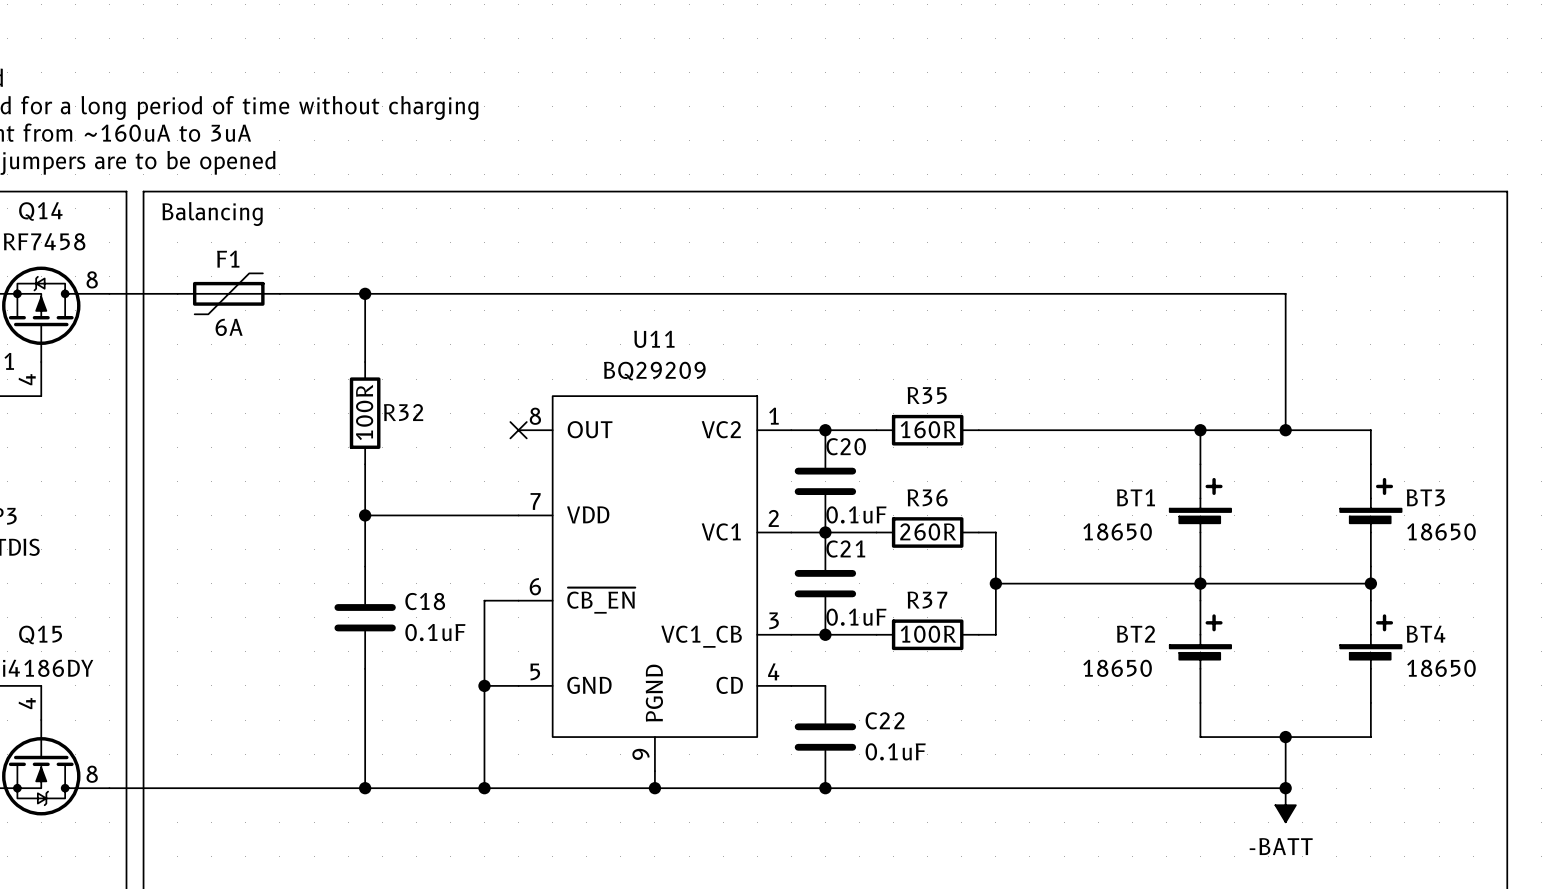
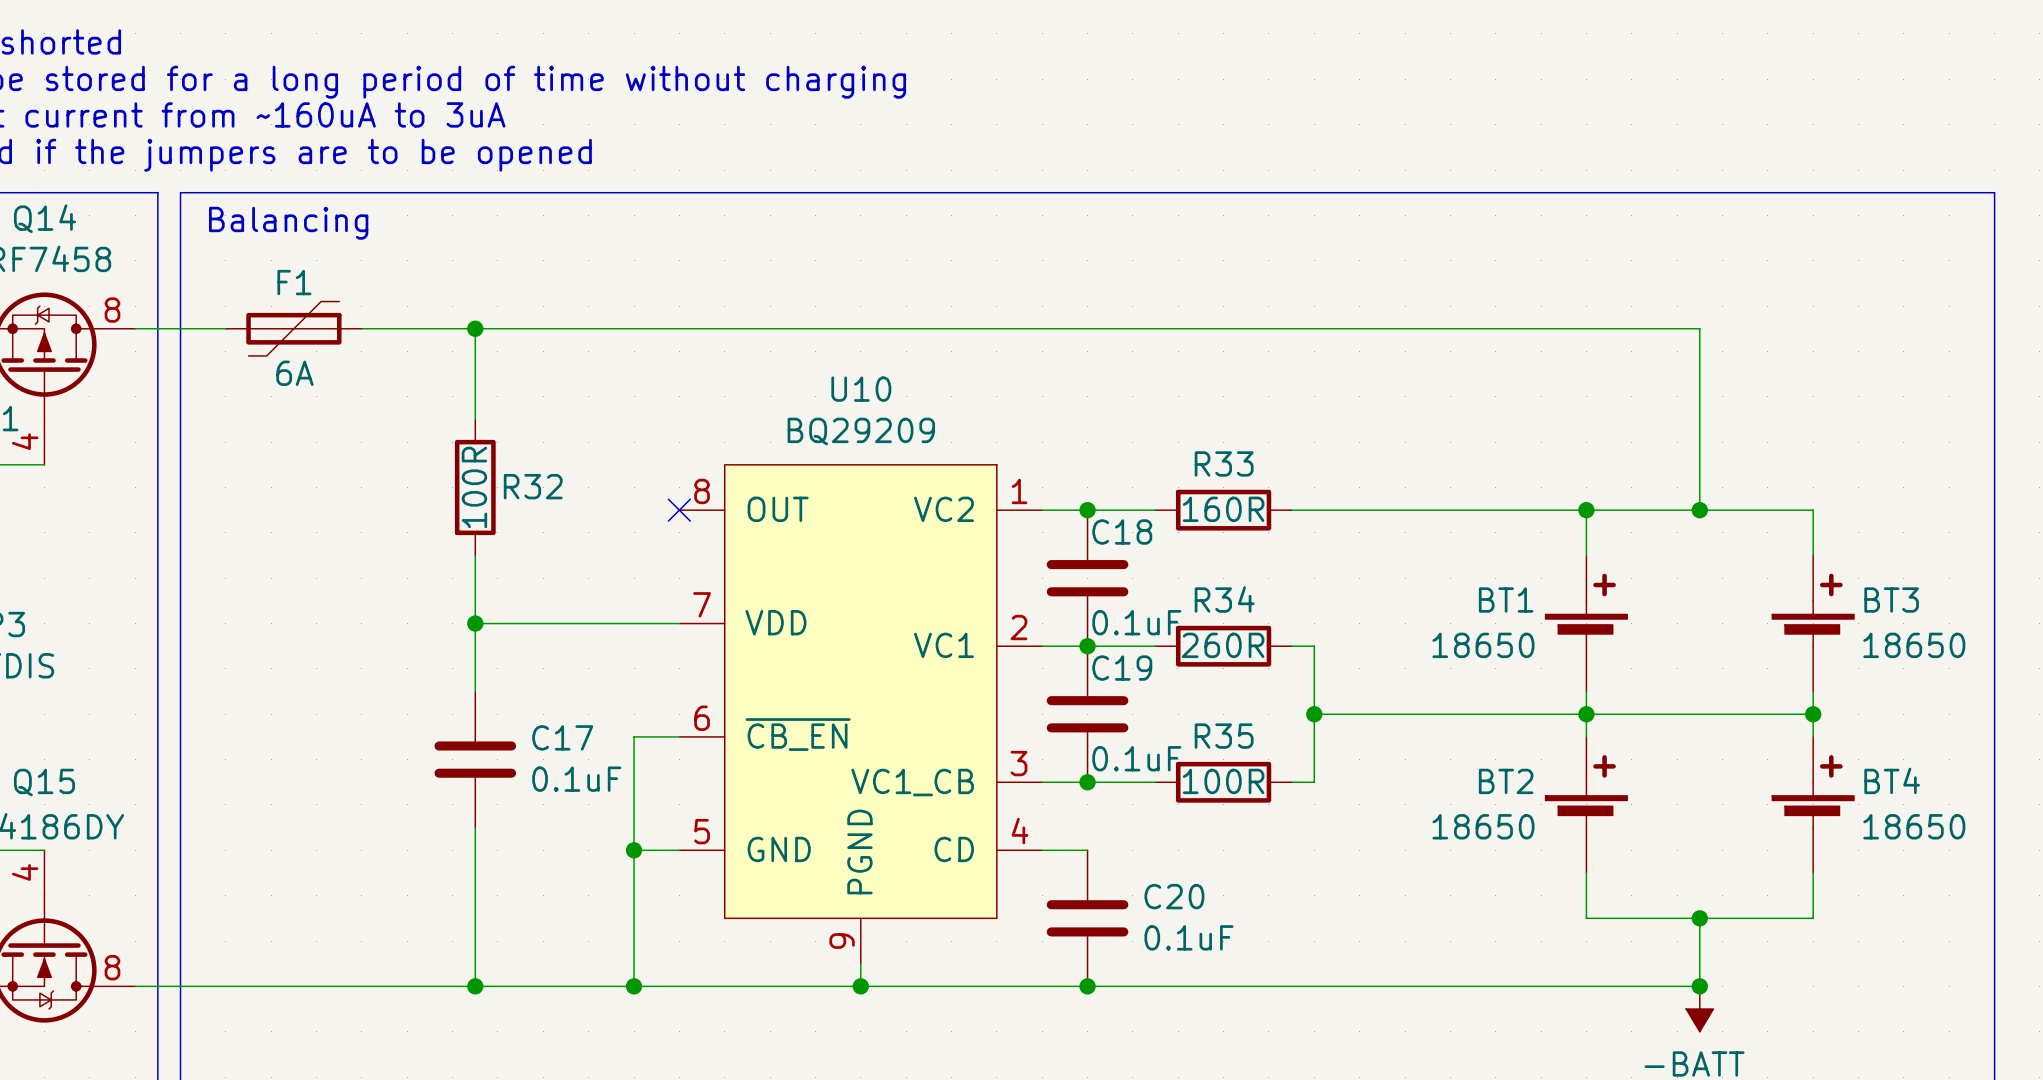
U11 name: U11 (654, 339) -> U10 (861, 389)
R35 name: R35 (927, 395) -> R33 (1224, 463)
C20 name: C20 (846, 446) -> C18 (1122, 531)
R36 name: R36 (927, 497) -> R34 (1224, 599)
C21 name: C21 (845, 548) -> C19 (1122, 668)
R37 name: R37 (927, 600) -> R35 (1224, 736)
C18 name: C18 (425, 601) -> C17 (562, 737)
C22 name: C22 (885, 720) -> C20 (1174, 896)

